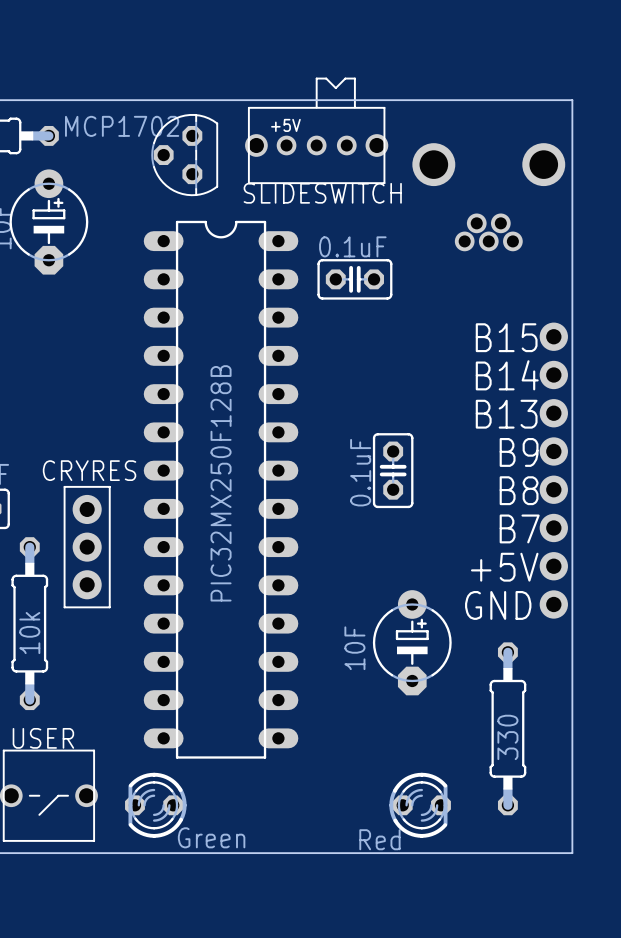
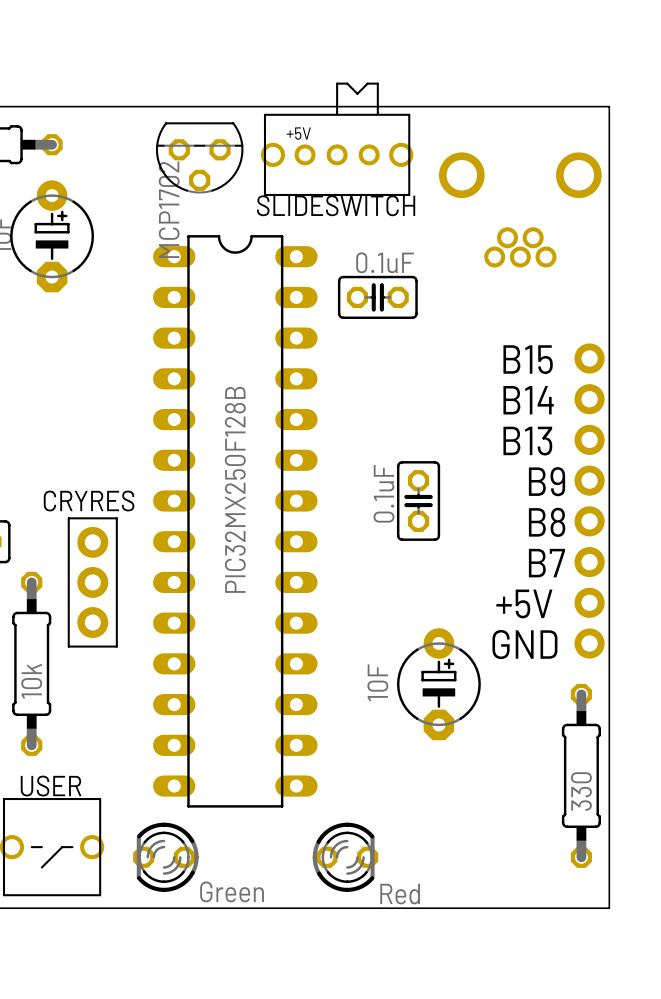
part rotation: 0° (184, 155) -> 90° counterclockwise (199, 157)
part position: (507, 728) -> (581, 775)
part position: (420, 805) -> (345, 857)

